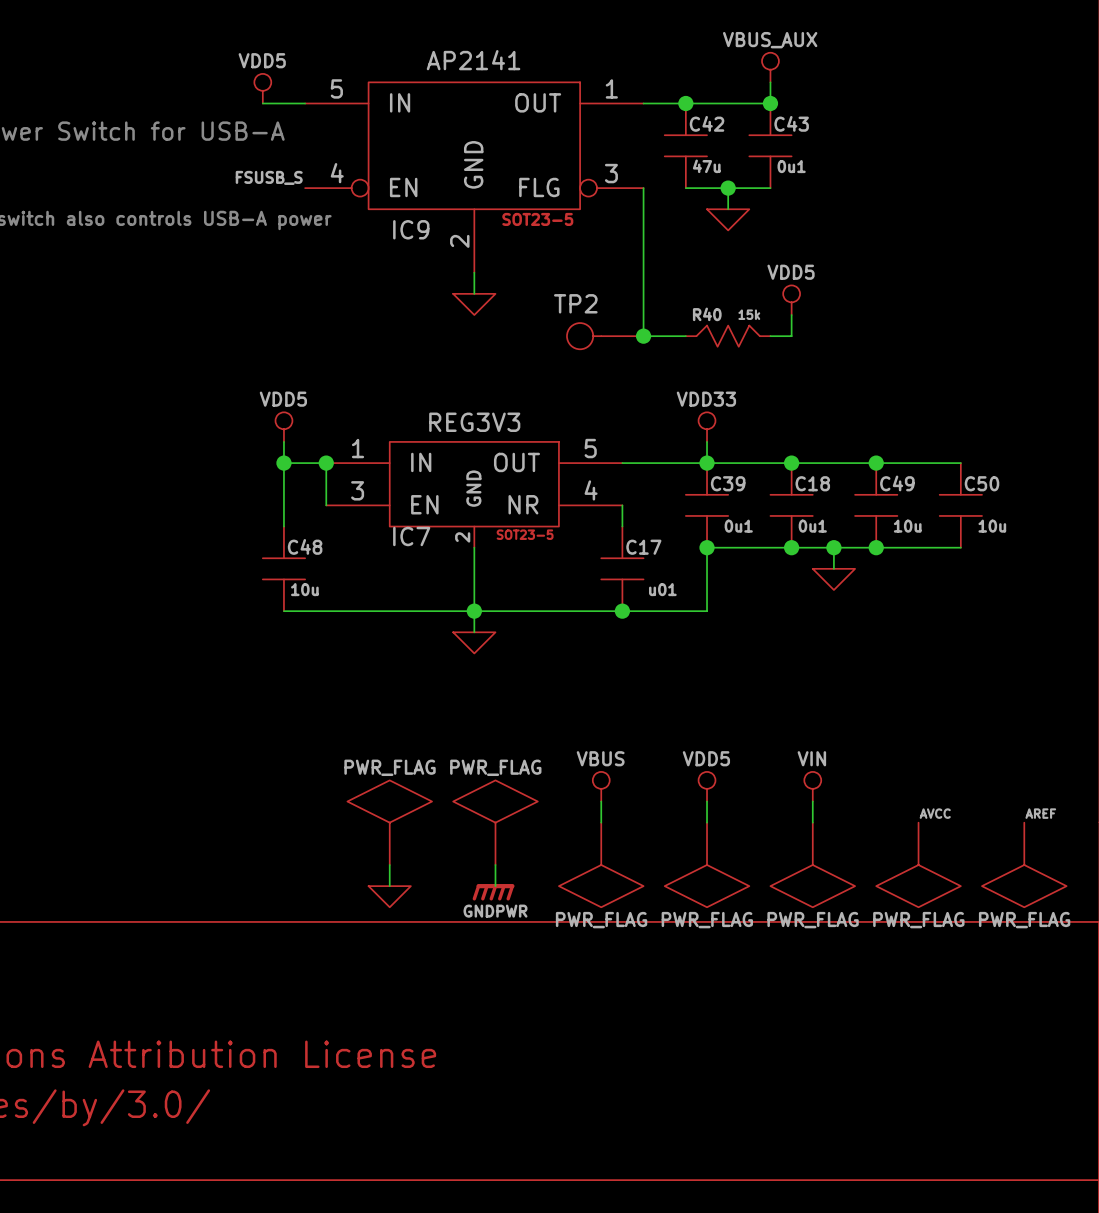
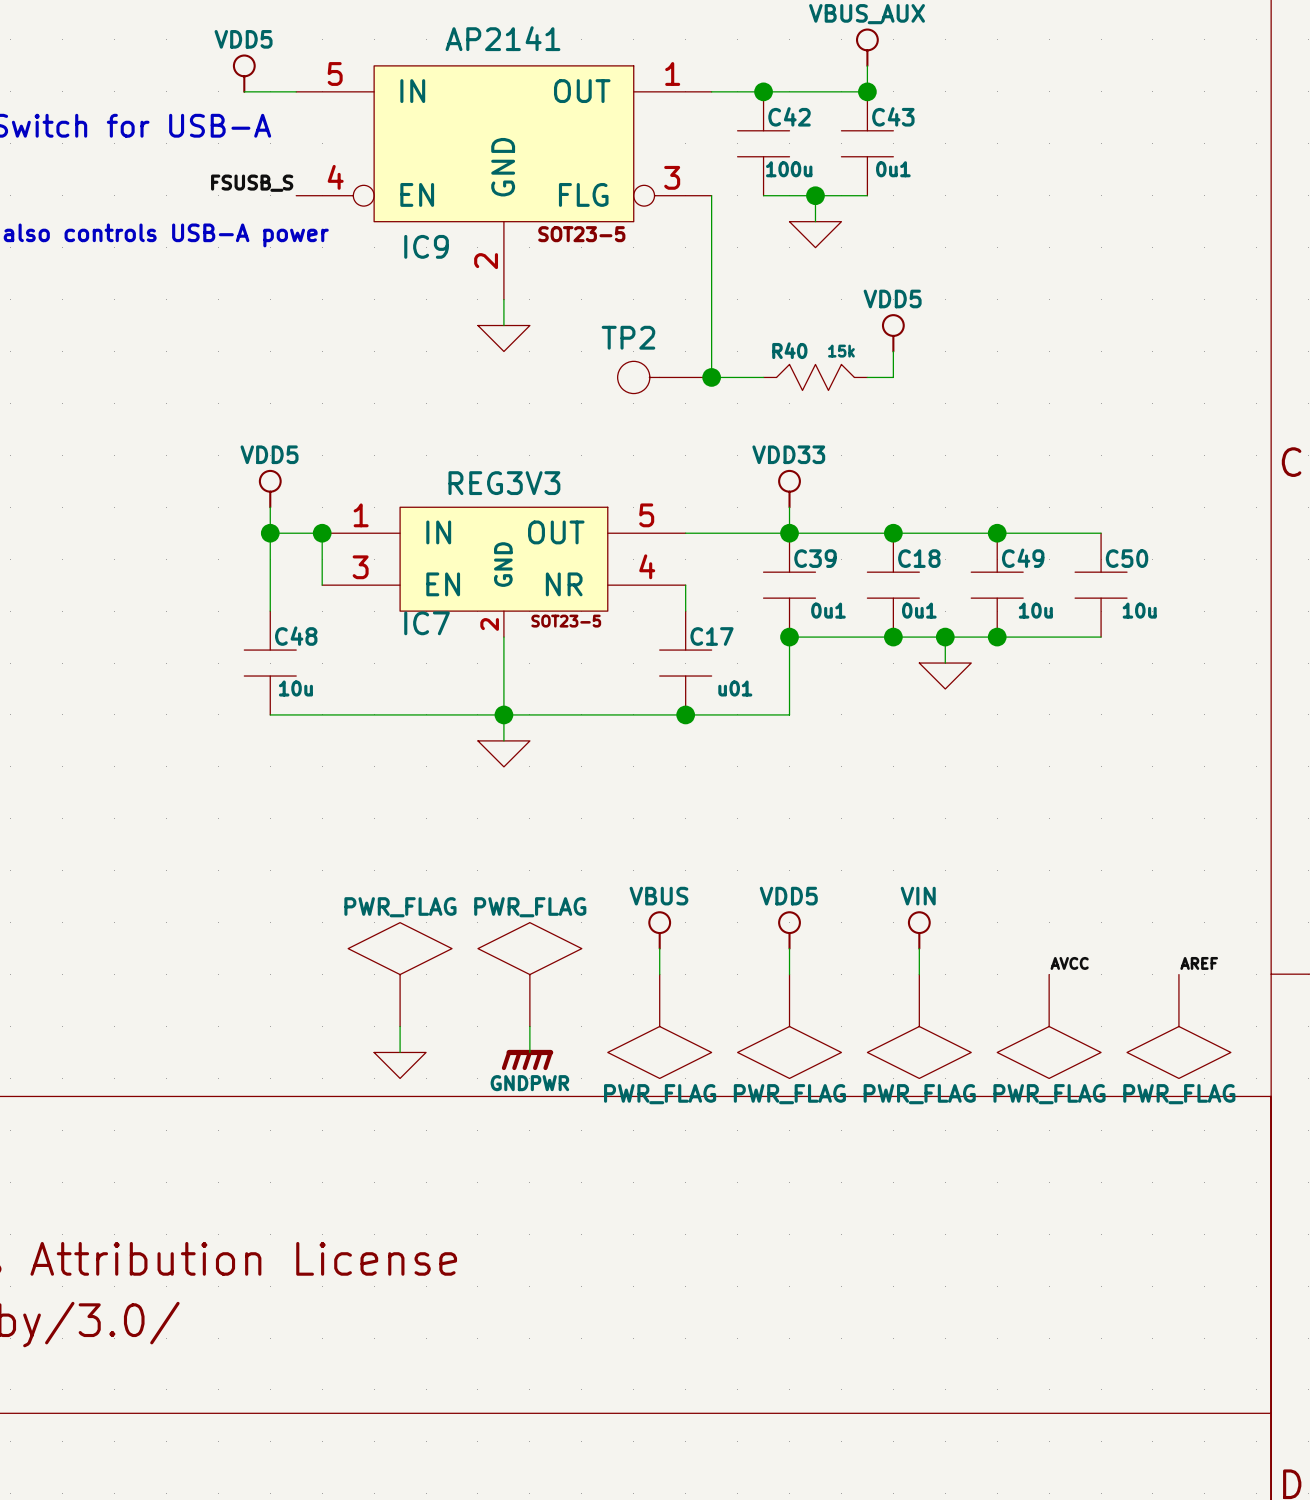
C42 value: 47u (706, 166) -> 100u (789, 169)

